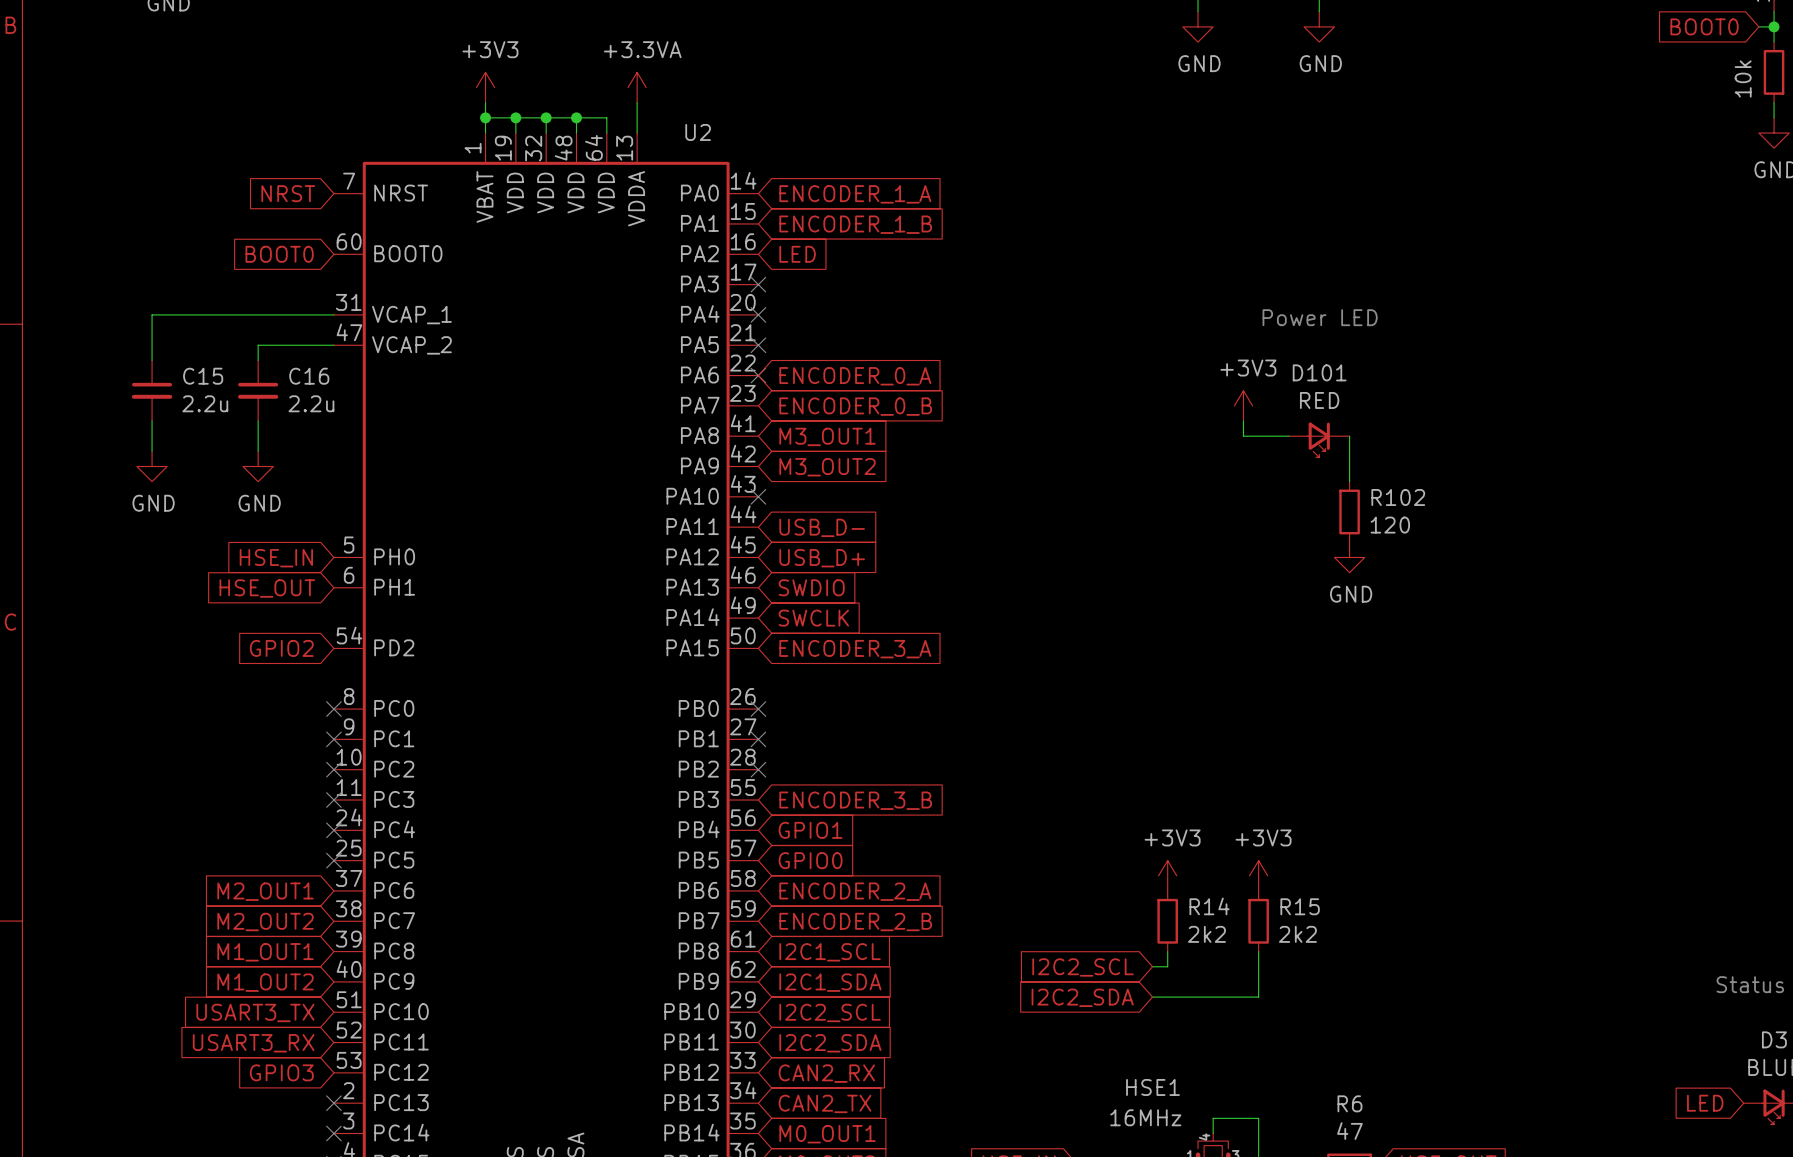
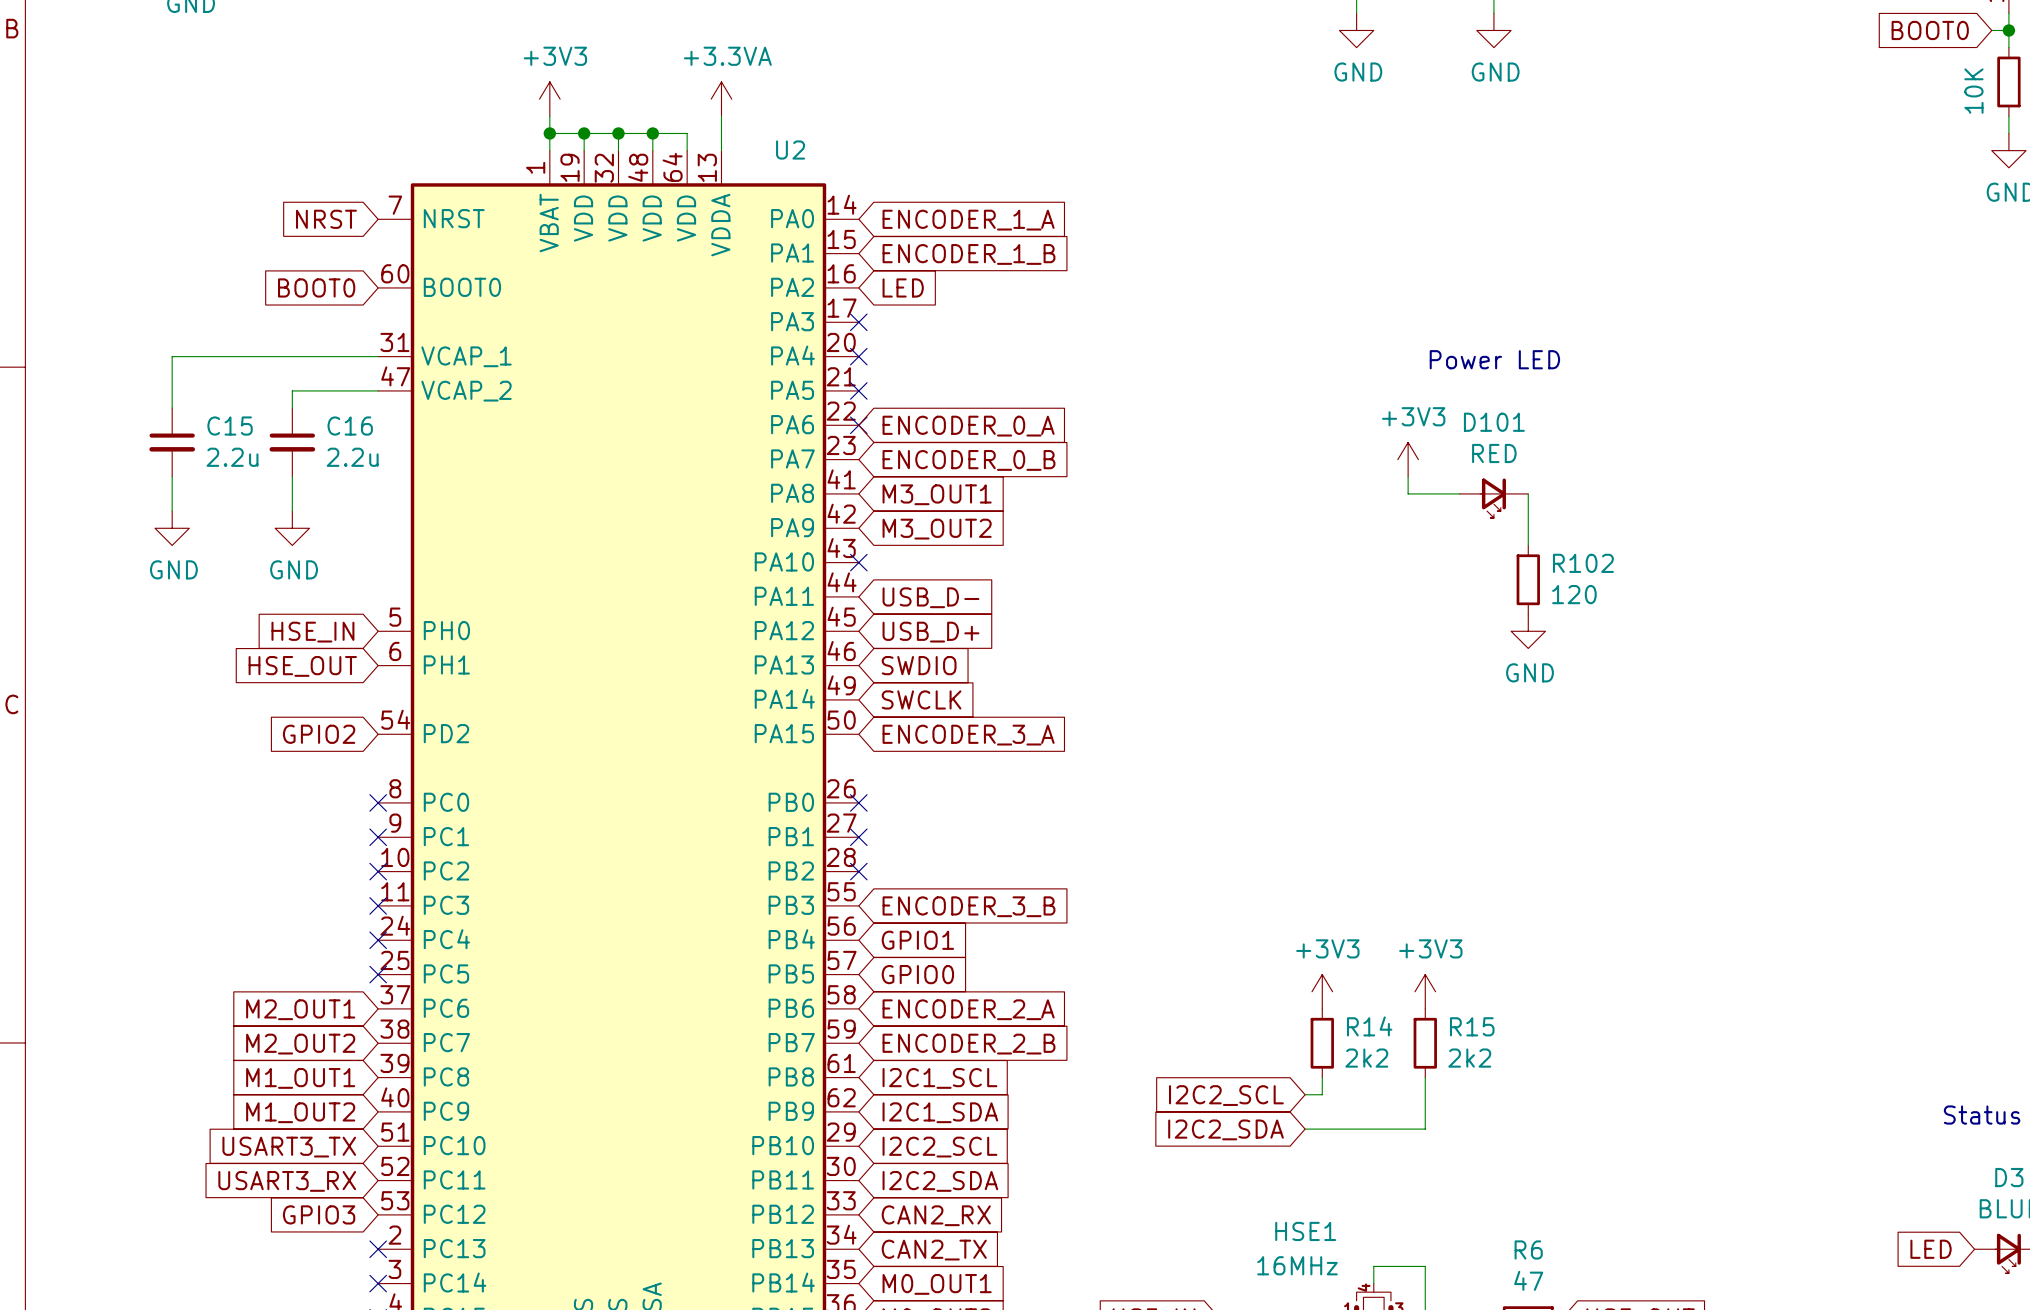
part value: 10k (1743, 79) -> 10K (1973, 91)

